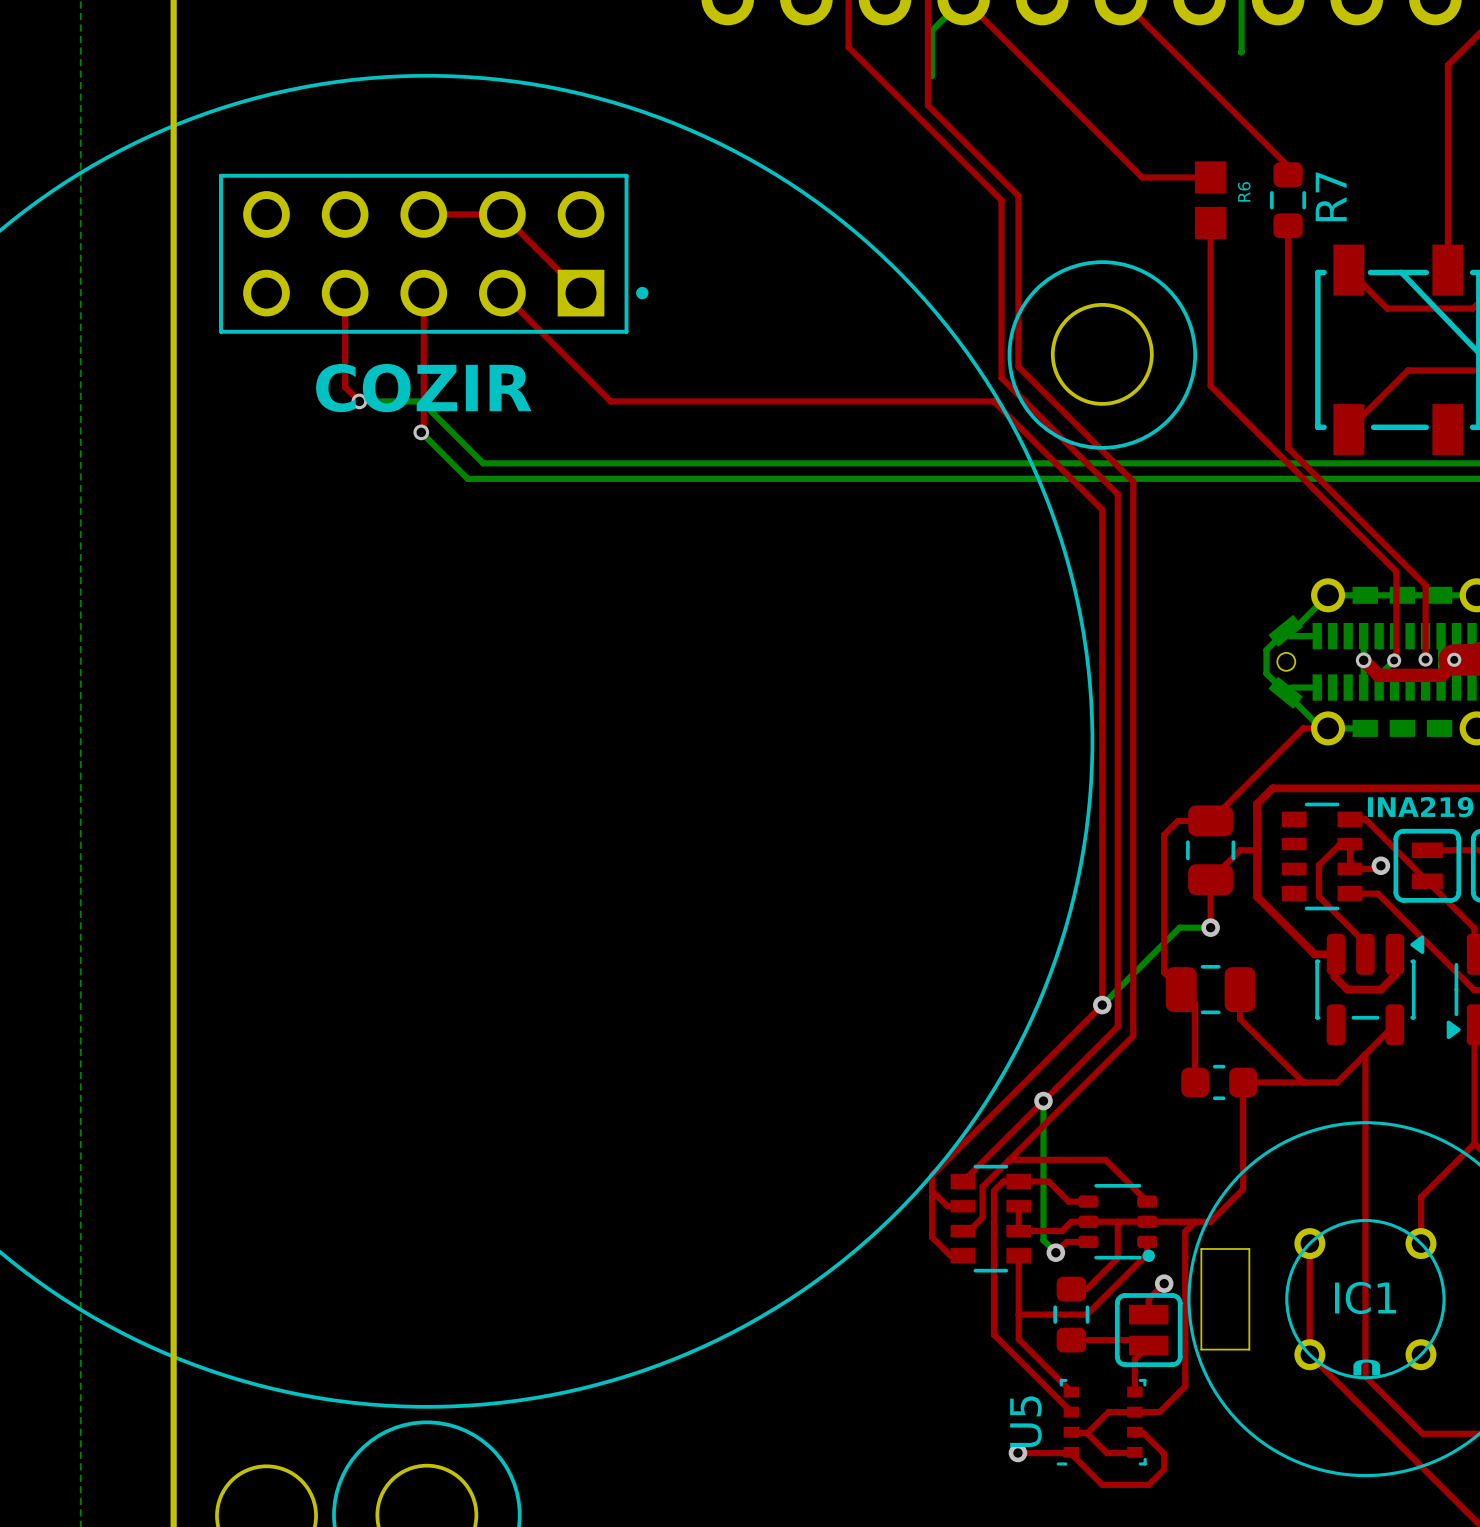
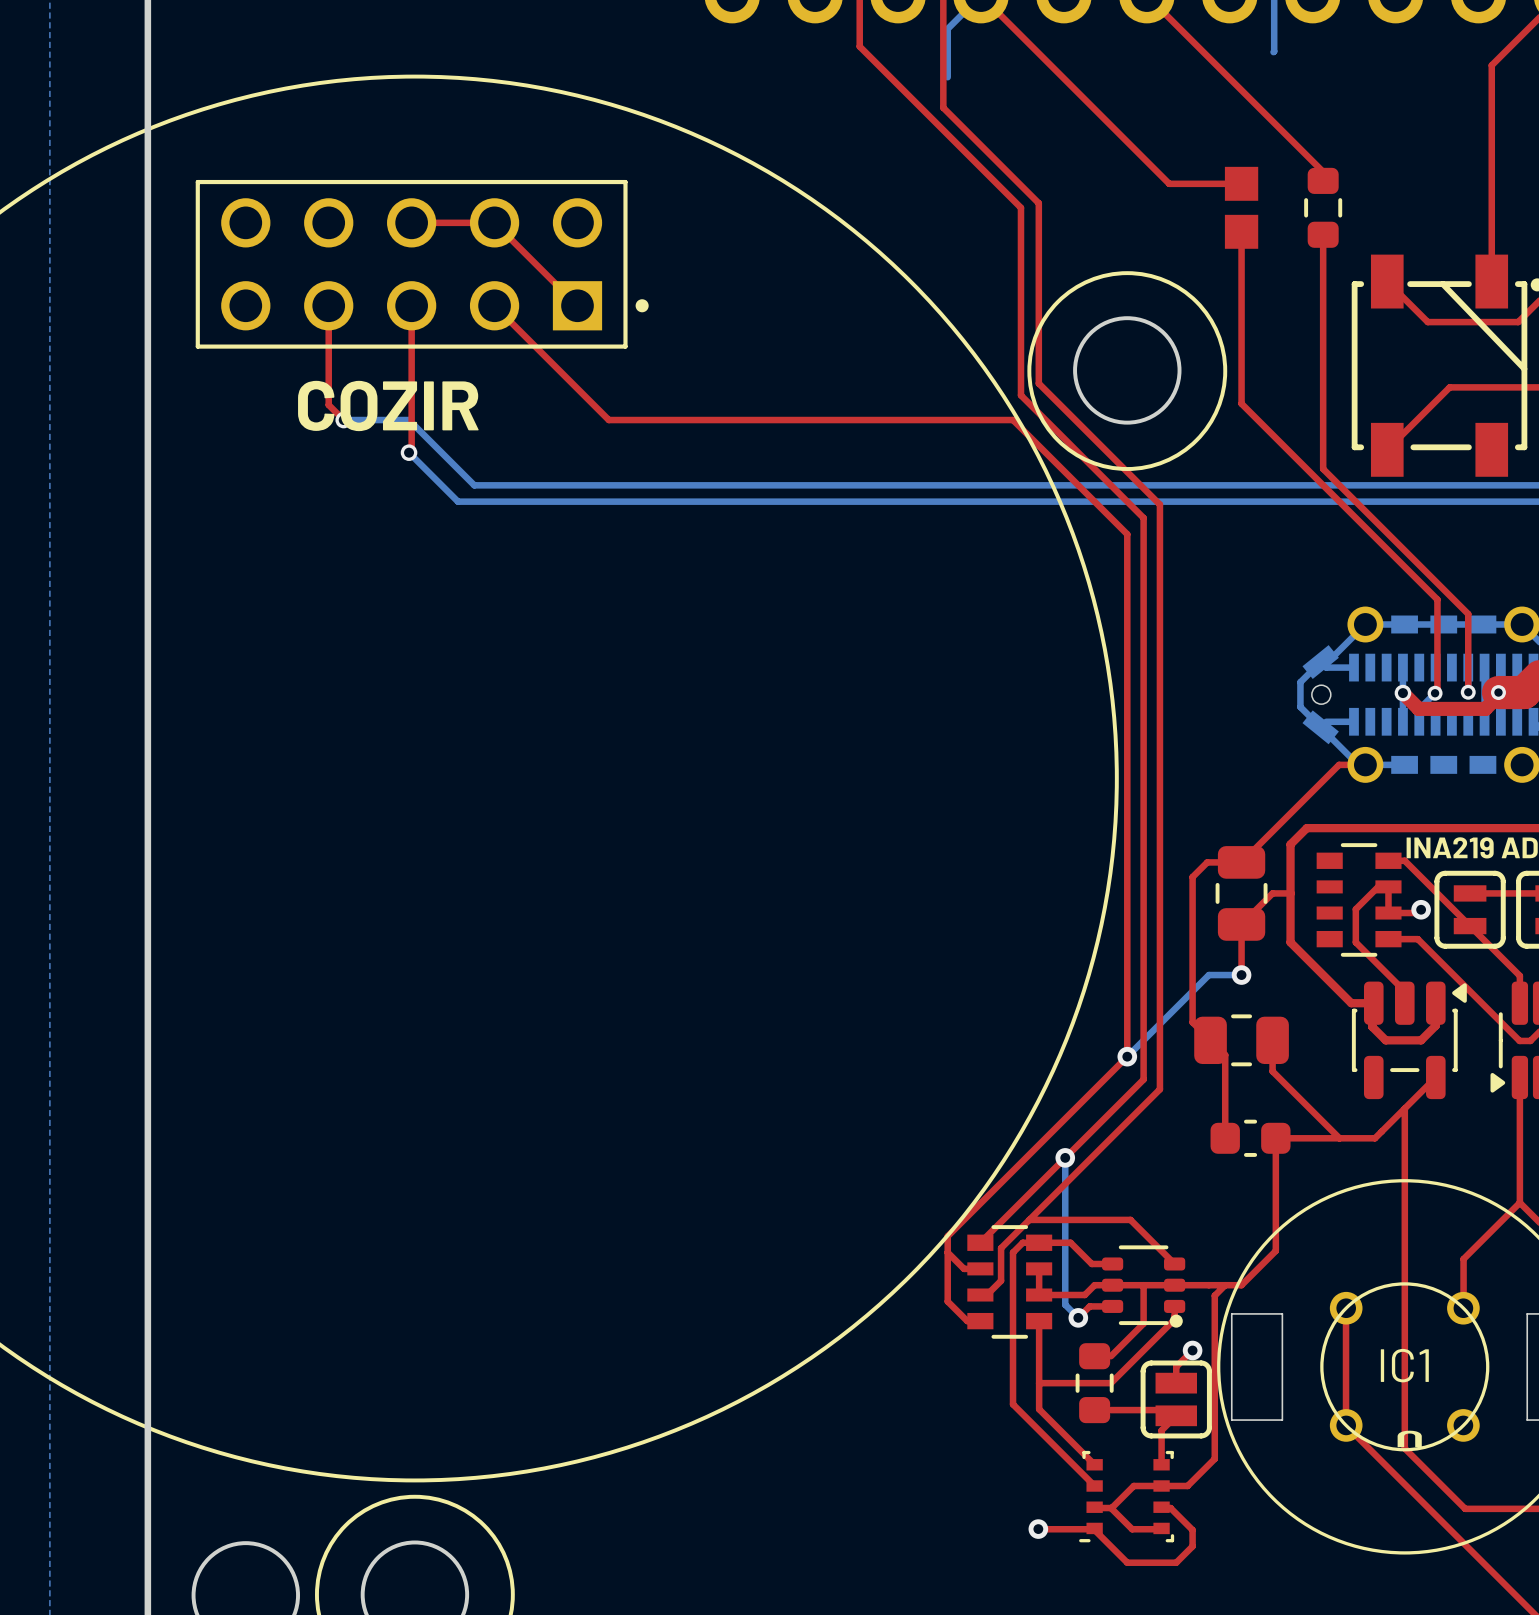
R6 name: R6 (1244, 191) -> none
R7 name: R7 (1331, 196) -> none
U5 name: U5 (1025, 1421) -> none

